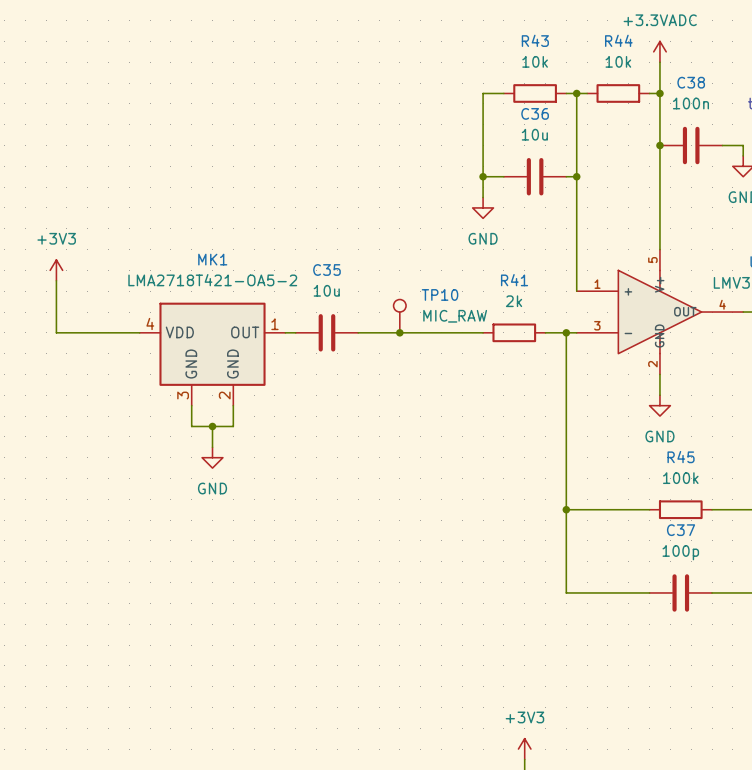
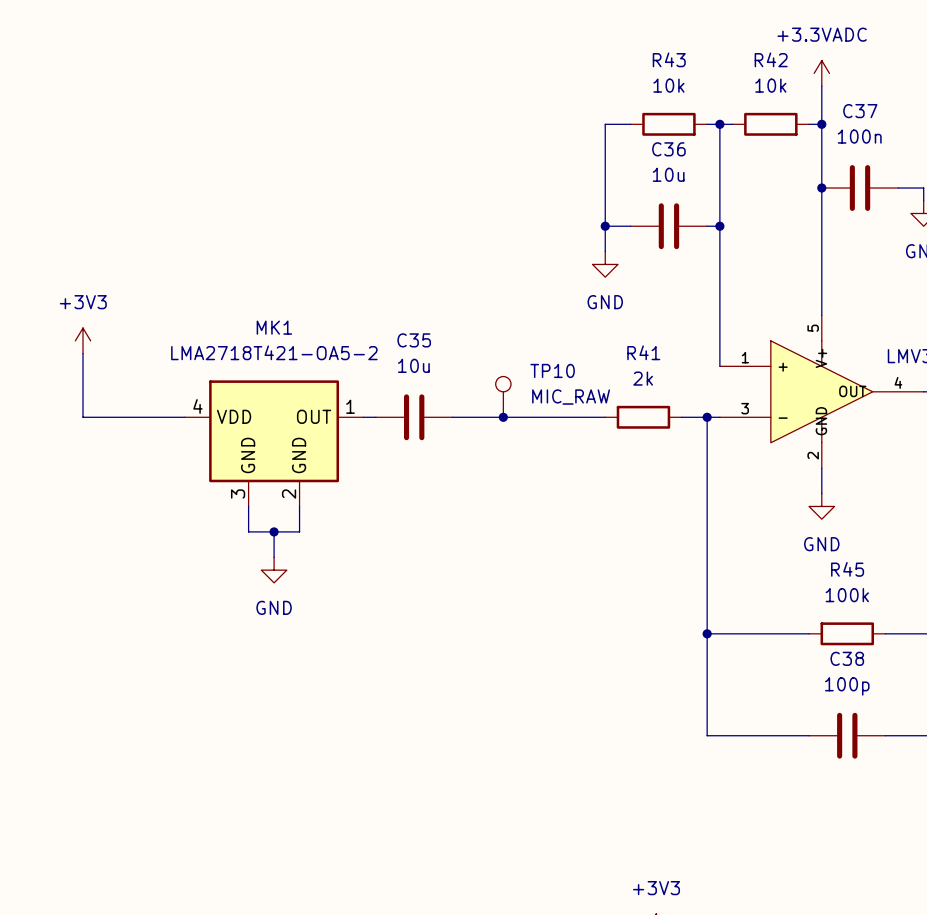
R44 name: R44 (618, 40) -> R42 (771, 59)
C38 name: C38 (691, 82) -> C37 (860, 111)
C37 name: C37 (681, 530) -> C38 (847, 658)

